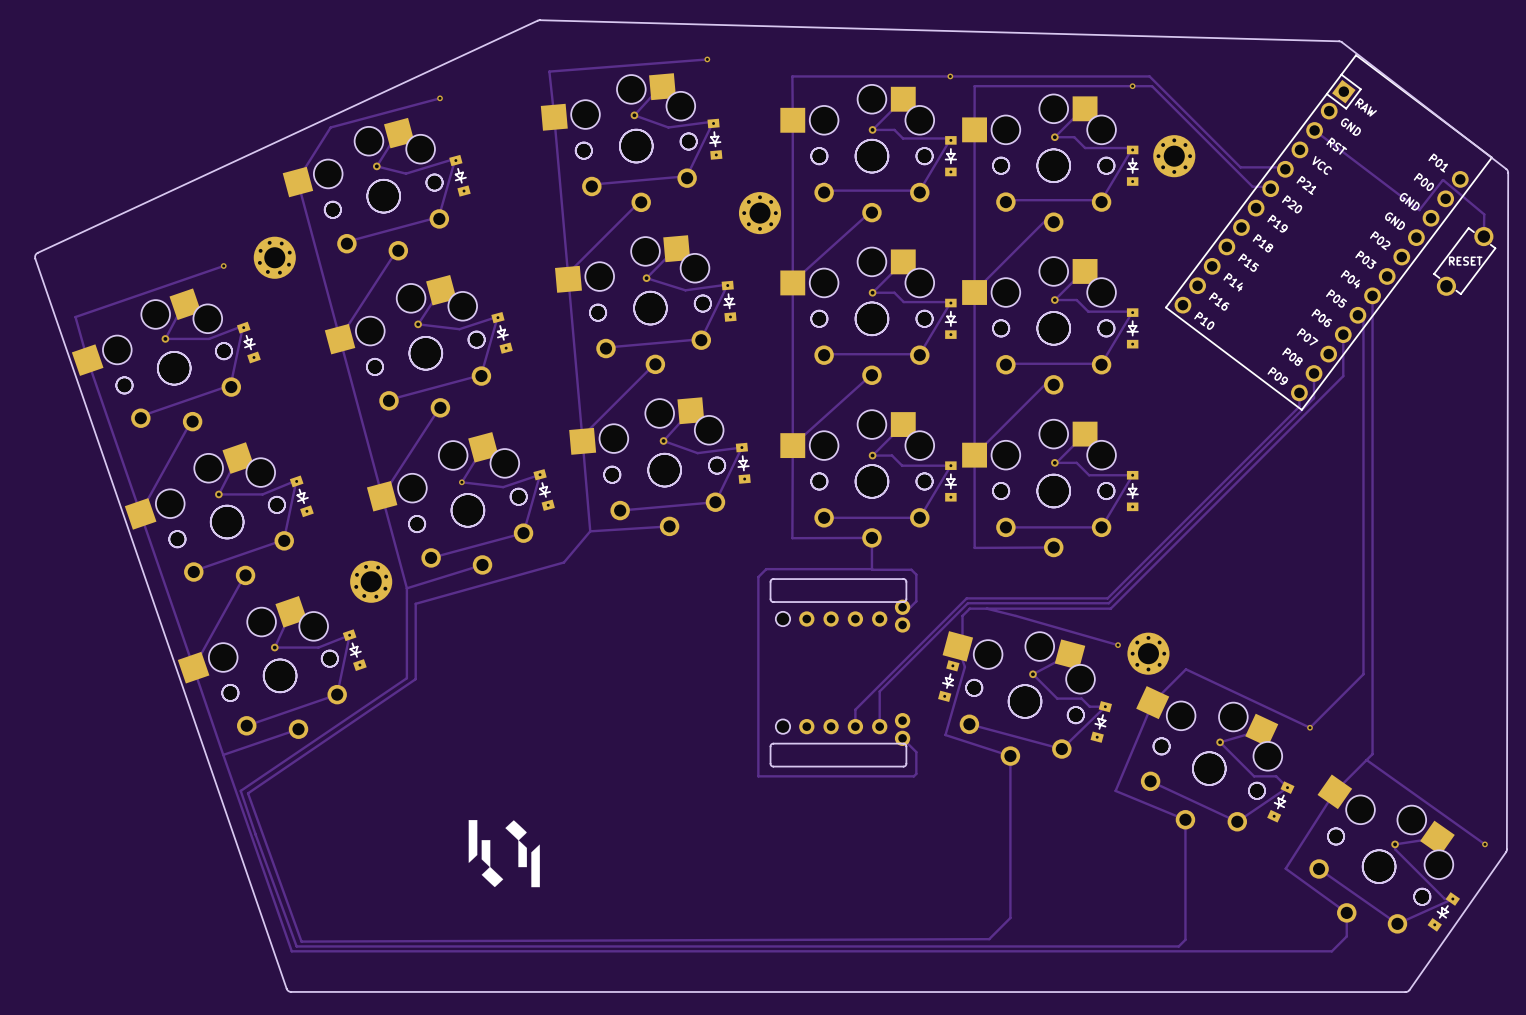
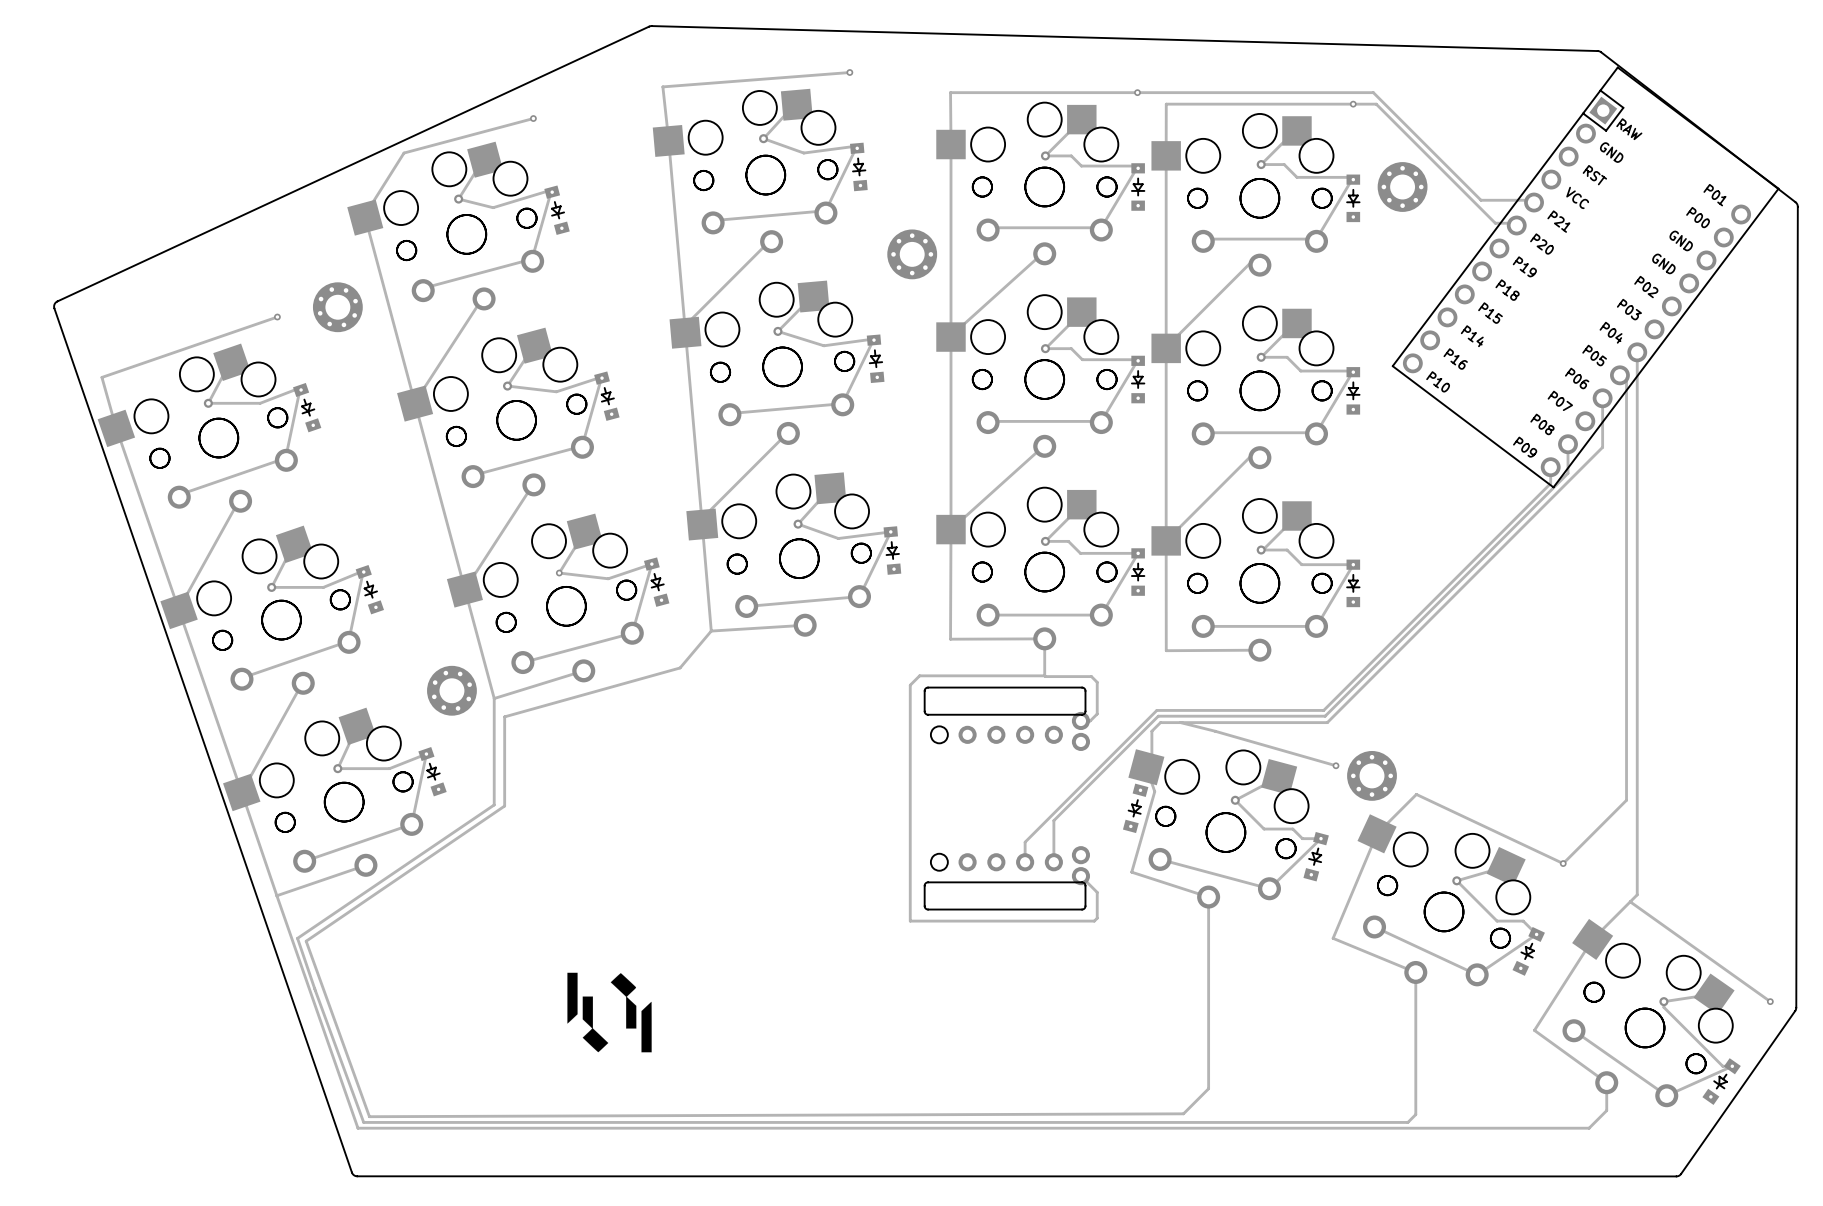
track: (1314, 130) (1419, 210) (1443, 180) (1484, 214) (1483, 236) -> none
part: (1464, 261) -> none

